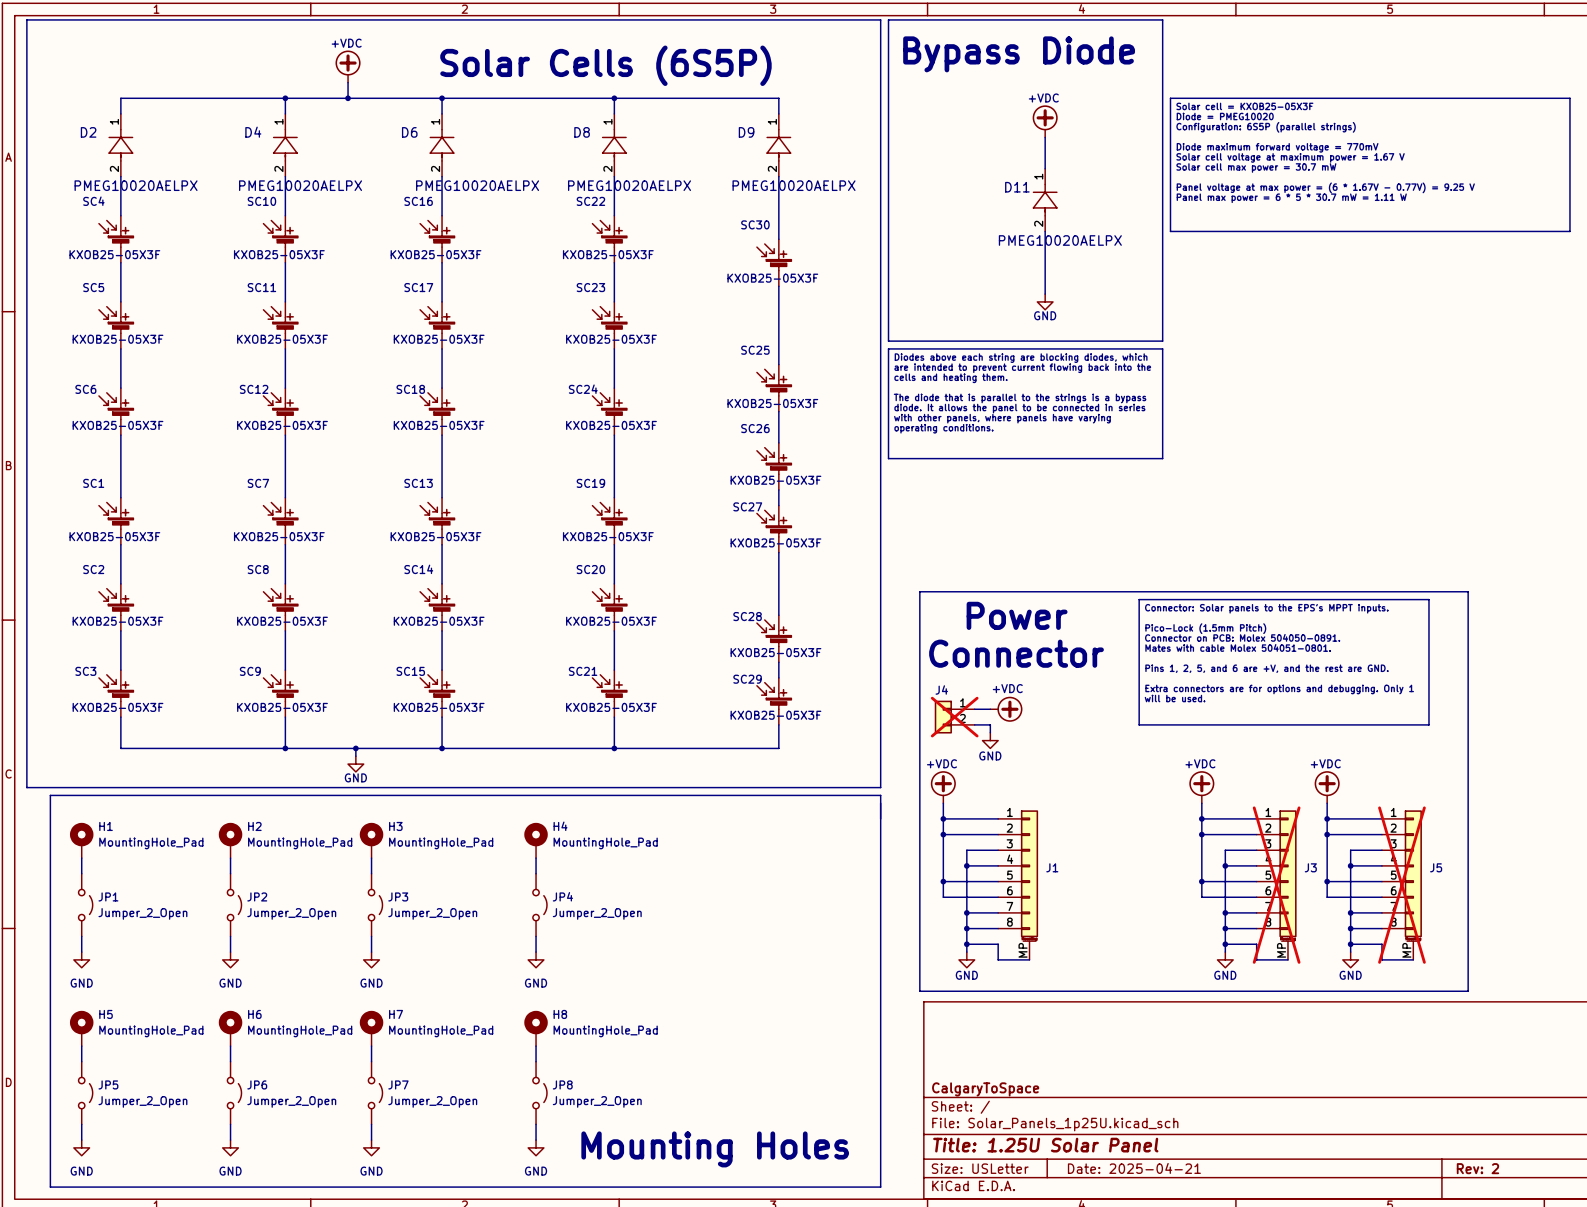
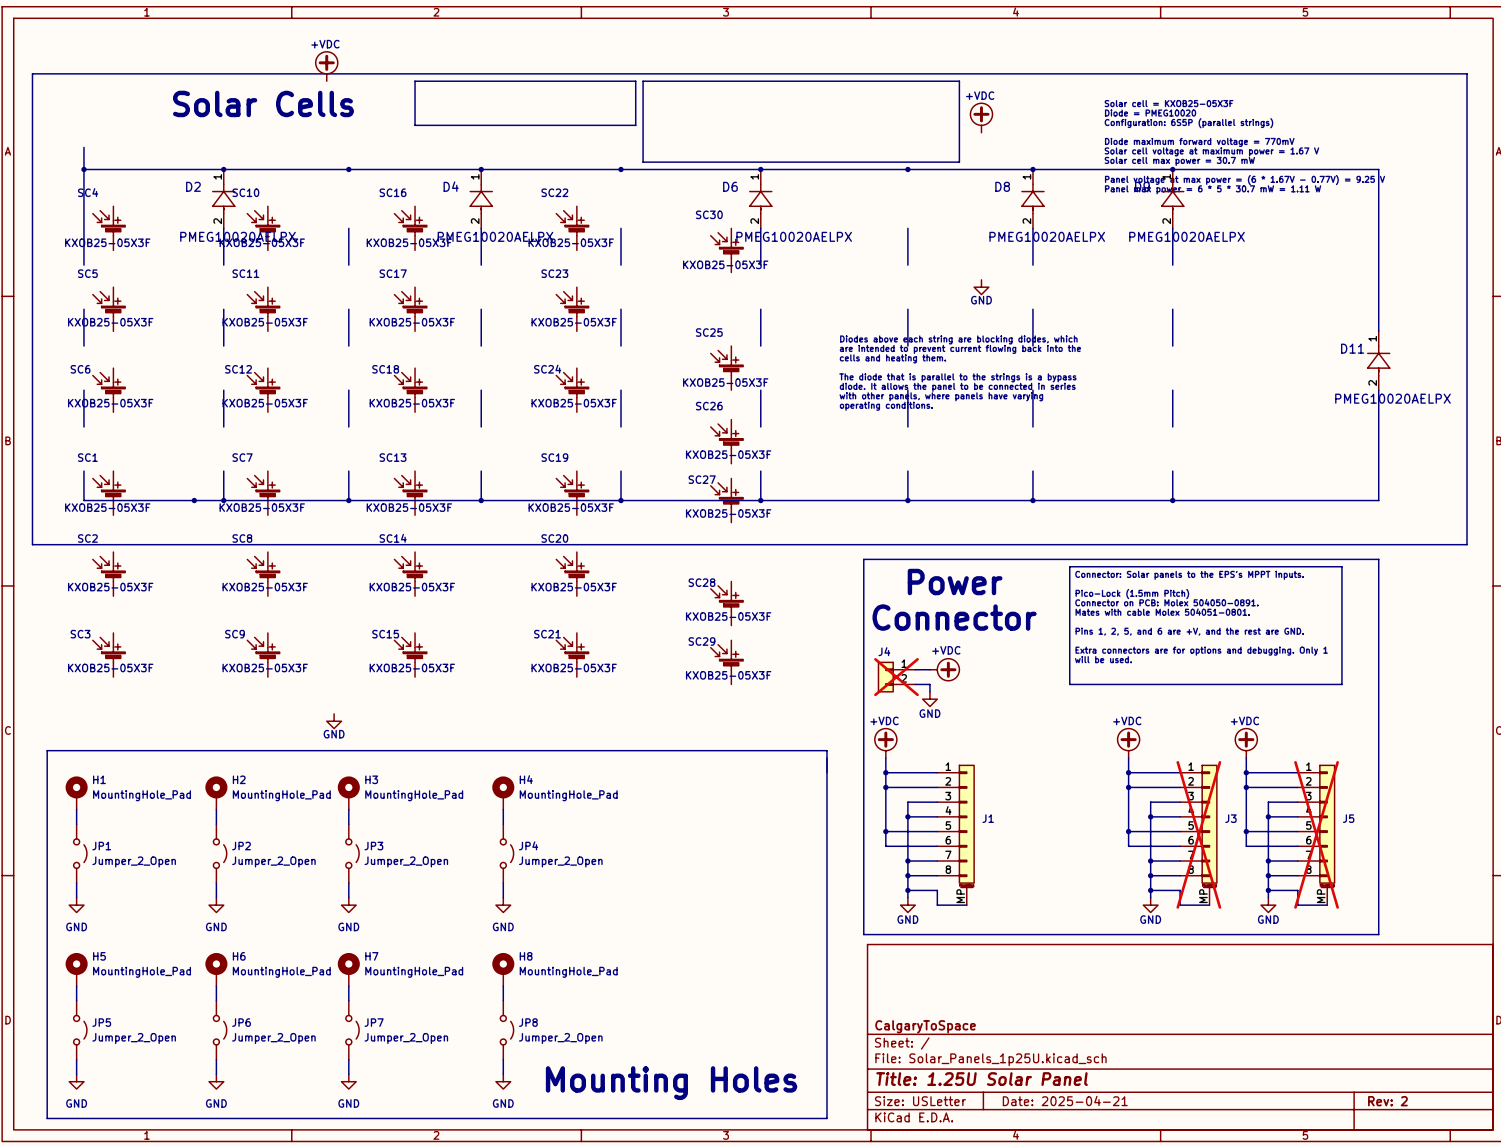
line: (26, 19) (880, 19) (880, 787) (26, 787) (26, 19) -> none
line: (888, 19) (1162, 19) (1162, 341) (888, 341) (888, 19) -> none
text: Bypass Diode (1019, 54) -> none
text: Solar Cells (6S5P) (605, 65) -> none
line: none -> (32, 73) (1467, 73) (1467, 544) (32, 544) (32, 73)
wire: (348, 82) (348, 98) -> none
line: none -> (415, 81) (635, 81) (635, 125) (415, 125) (415, 81)
line: none -> (643, 81) (959, 81) (959, 162) (643, 162) (643, 81)
wire: (285, 98) (285, 113) -> none
junction: (285, 98) -> none
junction: (348, 98) -> none
junction: (442, 98) -> none
wire: (614, 98) (614, 113) -> none
junction: (614, 98) -> none
line: (1170, 98) (1569, 98) (1569, 231) (1170, 231) (1170, 98) -> none
text: none -> Solar Cells (263, 103)
wire: (120, 113) (120, 98) (778, 98) (778, 113) -> none
wire: (1045, 137) (1045, 168) -> none
D2 position: (120, 145) -> (223, 198)
D4 position: (285, 145) -> (481, 198)
D6 position: (442, 145) -> (760, 198)
D8 position: (614, 145) -> (1032, 198)
D9 position: (778, 145) -> (1172, 198)
wire: none -> (83, 147) (83, 265)
wire: none -> (83, 169) (1378, 169) (1378, 331)
junction: none -> (83, 169)
wire: (120, 176) (120, 215) -> none
junction: none -> (223, 169)
wire: (285, 176) (285, 215) -> (223, 228) (223, 265)
junction: none -> (348, 169)
wire: (442, 176) (442, 215) -> (481, 228) (481, 265)
junction: none -> (481, 169)
wire: (614, 176) (614, 215) -> (621, 228) (621, 265)
junction: none -> (621, 169)
wire: (778, 176) (778, 239) -> none
junction: none -> (760, 169)
junction: none -> (907, 169)
junction: none -> (1032, 169)
junction: none -> (1172, 169)
D11 position: (1045, 200) -> (1378, 360)
wire: (1045, 231) (1045, 294) -> none
wire: none -> (348, 228) (348, 265)
wire: none -> (760, 228) (760, 265)
wire: none -> (907, 228) (907, 265)
wire: none -> (1032, 228) (1032, 265)
wire: none -> (1172, 228) (1172, 265)
wire: (120, 262) (120, 301) -> (83, 309) (83, 346)
wire: (285, 262) (285, 301) -> (223, 309) (223, 346)
wire: (442, 262) (442, 301) -> (481, 309) (481, 346)
wire: (614, 262) (614, 301) -> (621, 309) (621, 346)
wire: (778, 286) (778, 364) -> none
wire: none -> (348, 309) (348, 346)
wire: none -> (760, 309) (760, 346)
wire: none -> (907, 309) (907, 346)
wire: none -> (1032, 309) (1032, 346)
wire: none -> (1172, 309) (1172, 346)
wire: (120, 348) (120, 388) -> (83, 390) (83, 426)
wire: (285, 348) (285, 388) -> (223, 390) (223, 426)
wire: (442, 348) (442, 388) -> (481, 390) (481, 426)
wire: (614, 348) (614, 388) -> (621, 390) (621, 426)
line: (888, 348) (888, 458) (1162, 458) (1162, 348) (888, 348) -> none
wire: (778, 411) (778, 442) -> (760, 471) (760, 500)
wire: none -> (760, 390) (760, 426)
wire: none -> (907, 390) (907, 426)
wire: none -> (1032, 390) (1032, 426)
wire: none -> (1172, 390) (1172, 426)
wire: none -> (1378, 390) (1378, 500) (83, 500) (83, 471)
wire: (120, 435) (120, 497) -> none
wire: (285, 435) (285, 497) -> none
wire: (442, 435) (442, 497) -> none
wire: (614, 435) (614, 497) -> none
wire: (778, 489) (778, 505) -> none
wire: none -> (223, 471) (223, 500)
wire: none -> (348, 471) (348, 500)
wire: none -> (481, 471) (481, 500)
wire: none -> (621, 471) (621, 500)
wire: none -> (907, 471) (907, 500)
wire: none -> (1032, 471) (1032, 500)
wire: none -> (1172, 471) (1172, 500)
junction: none -> (194, 500)
junction: none -> (223, 500)
junction: none -> (348, 500)
junction: none -> (481, 500)
junction: none -> (621, 500)
junction: none -> (760, 500)
junction: none -> (907, 500)
junction: none -> (1032, 500)
junction: none -> (1172, 500)
wire: (120, 544) (120, 583) -> none
wire: (285, 544) (285, 583) -> none
wire: (442, 544) (442, 583) -> (348, 390) (348, 426)
wire: (614, 544) (614, 583) -> none
wire: (778, 552) (778, 615) -> none
wire: (120, 630) (120, 670) -> none
wire: (285, 630) (285, 670) -> none
wire: (442, 630) (442, 670) -> none
wire: (614, 630) (614, 670) -> none
wire: (778, 662) (778, 677) -> none
wire: (120, 717) (120, 748) (778, 748) (778, 724) -> none
wire: (285, 717) (285, 748) -> none
wire: (442, 717) (442, 748) -> none
wire: (614, 717) (614, 748) -> none
junction: (285, 748) -> none
wire: (355, 748) (355, 756) -> none
junction: (355, 748) -> none
junction: (442, 748) -> none
junction: (614, 748) -> none

